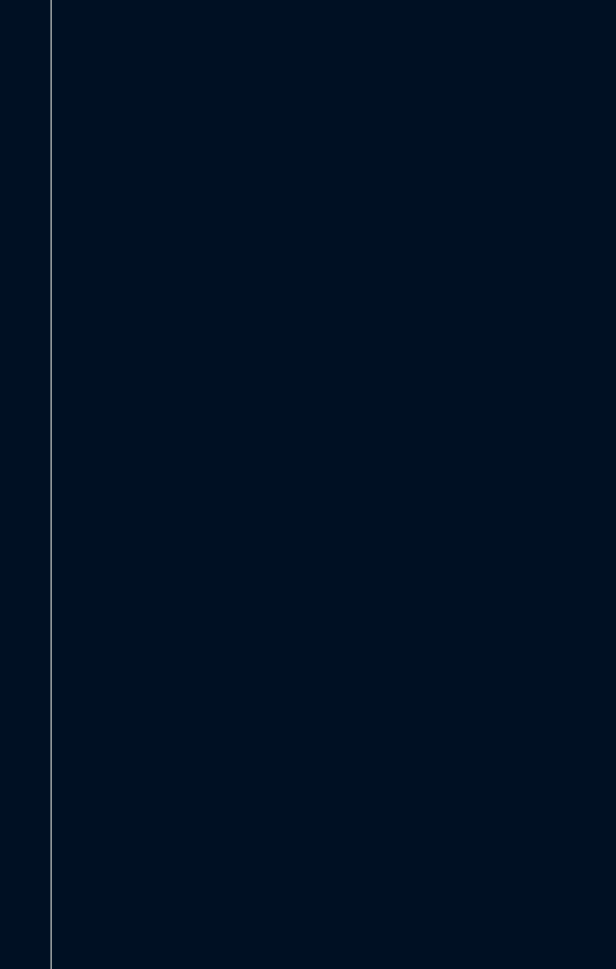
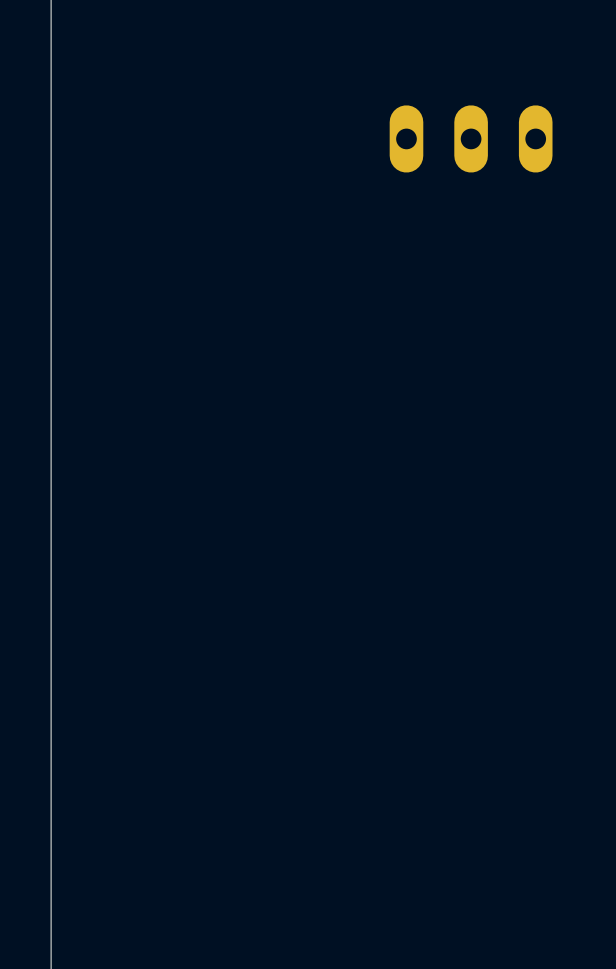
part: none -> (471, 138)

